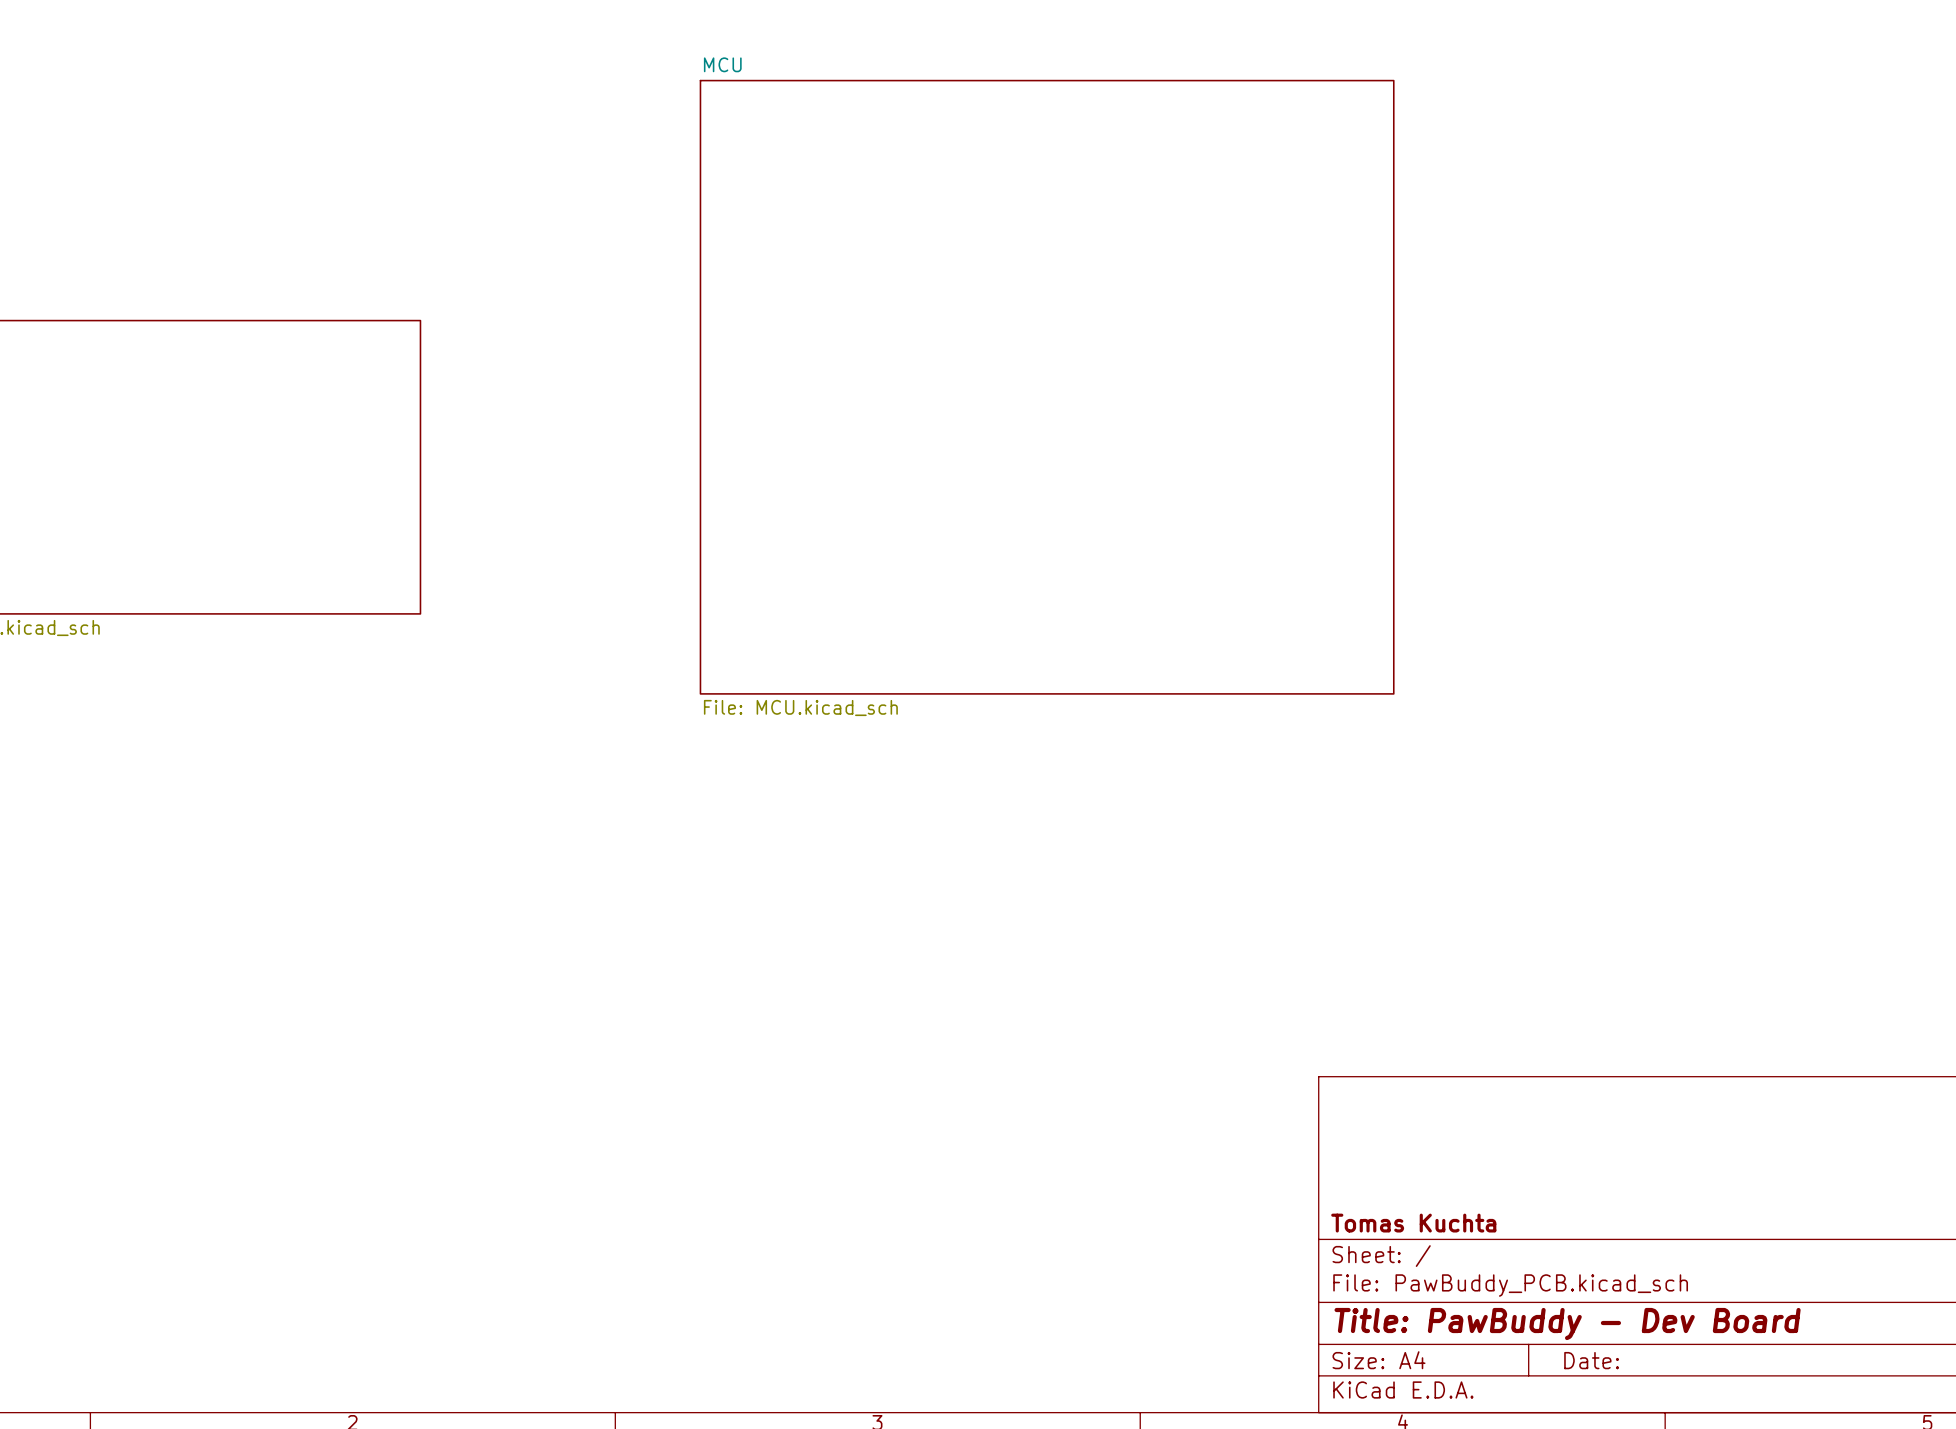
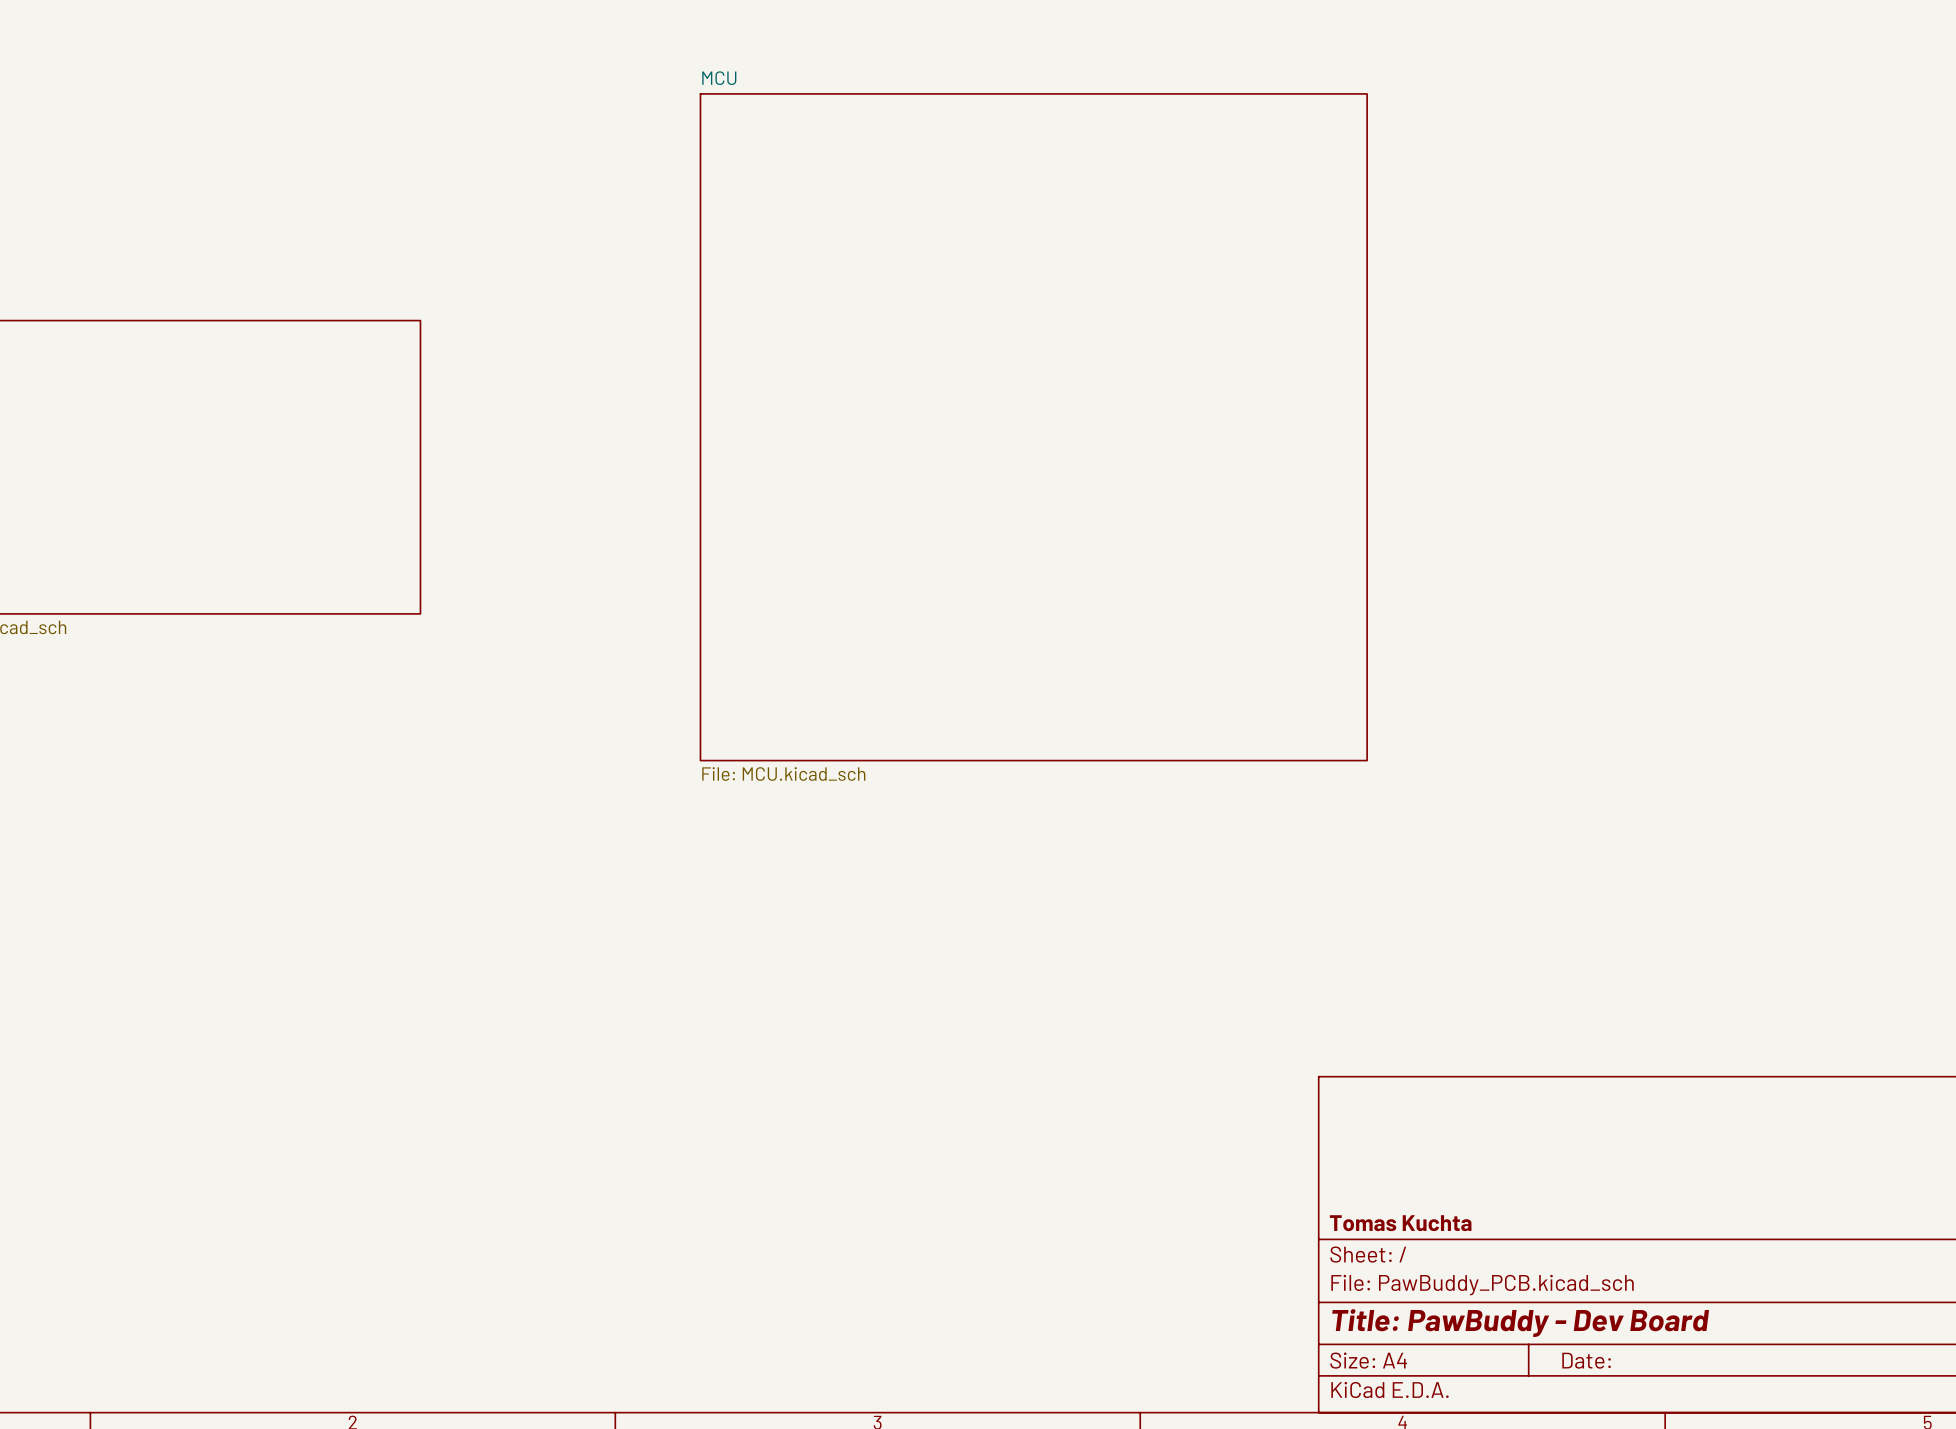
sheet MCU: File: MCU.kicad_sch (1047, 387) -> none
sheet MCU: none -> File: MCU.kicad_sch (1033, 427)

